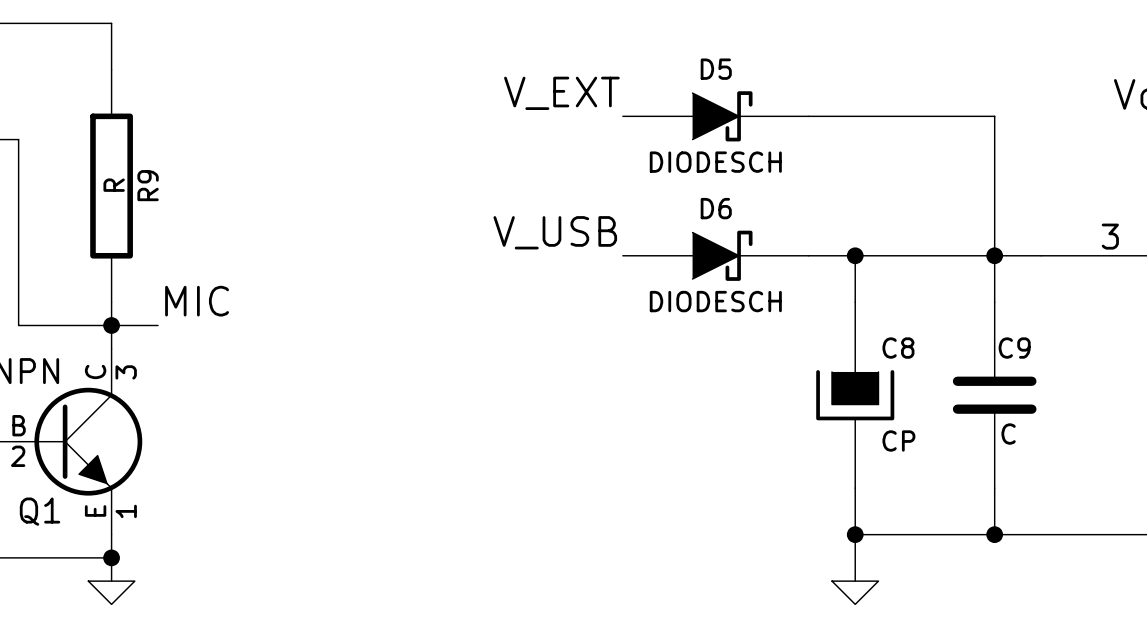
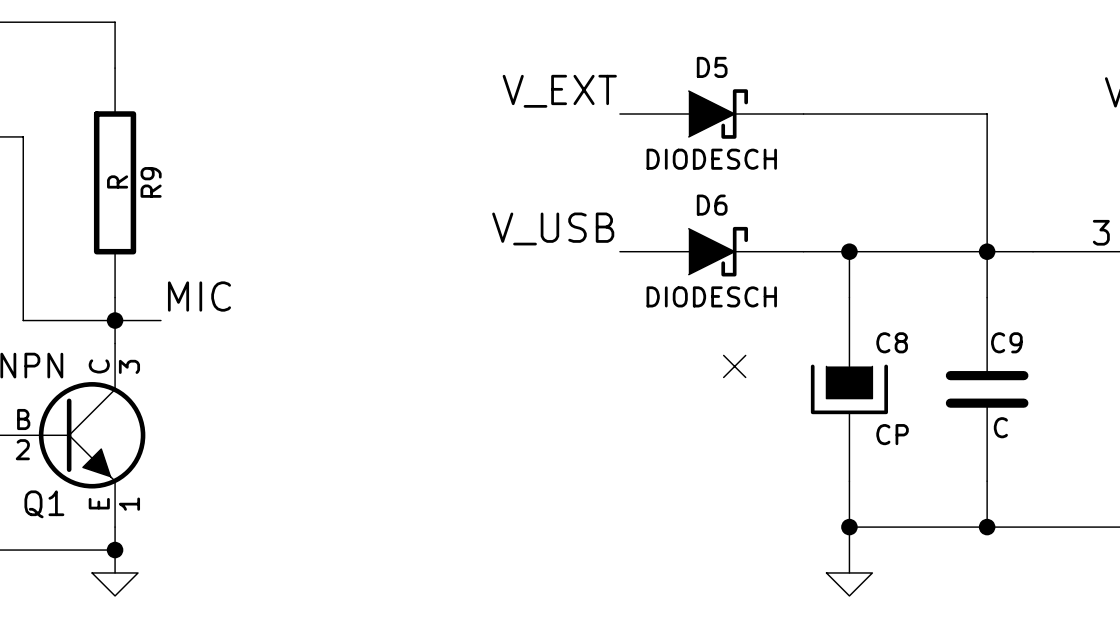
no-connect mark: none -> (734, 366)

